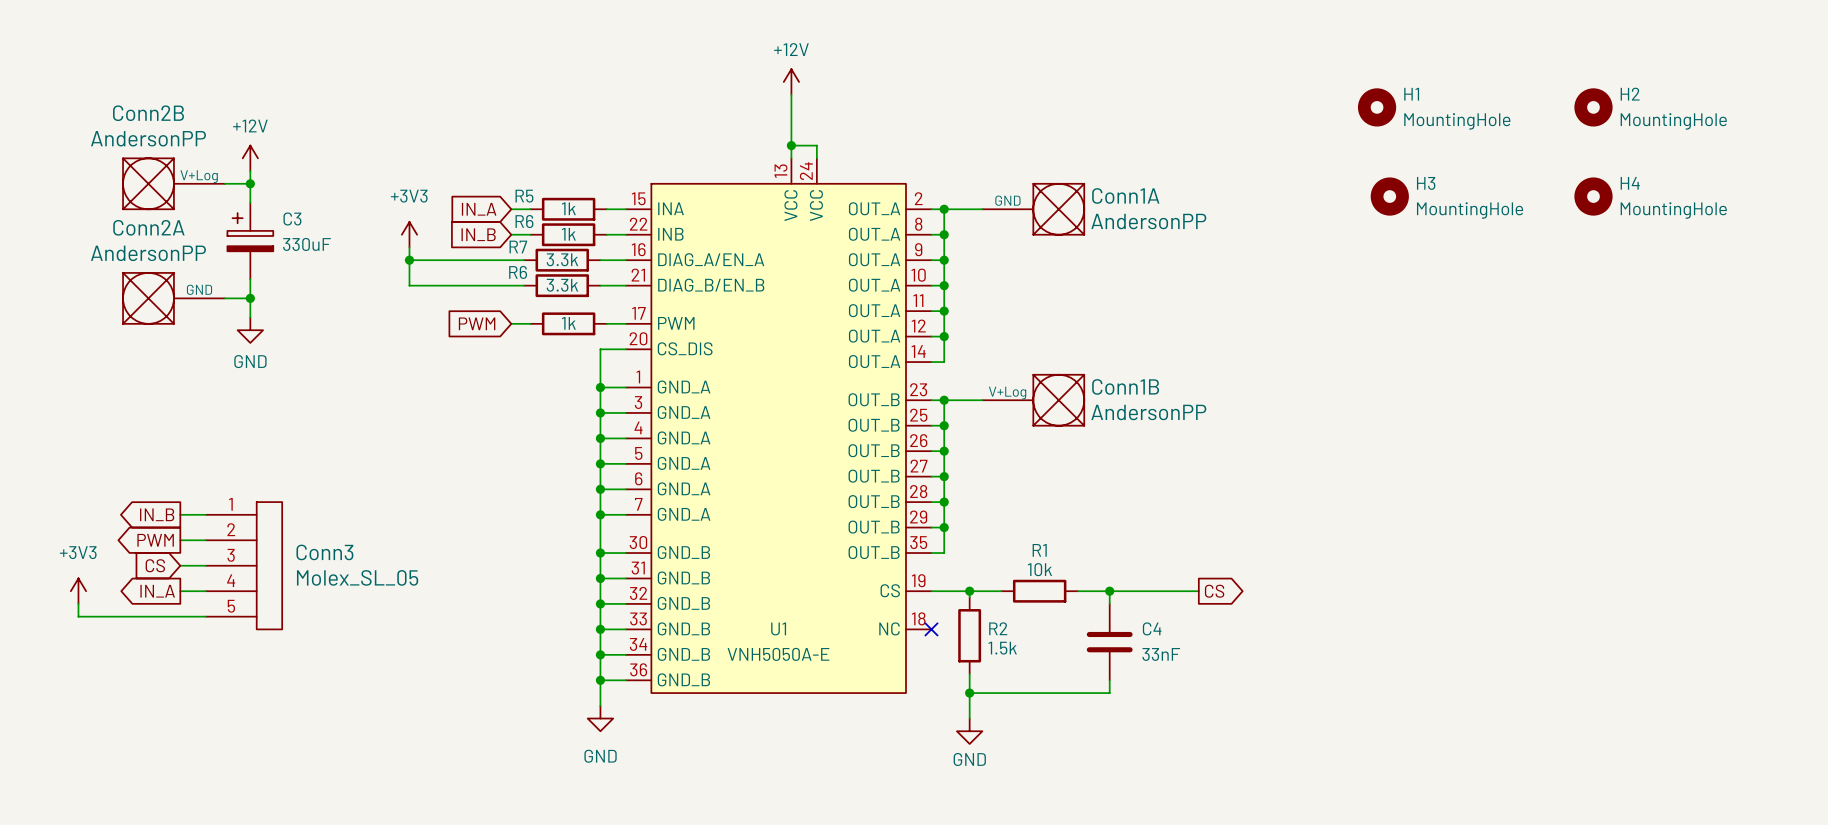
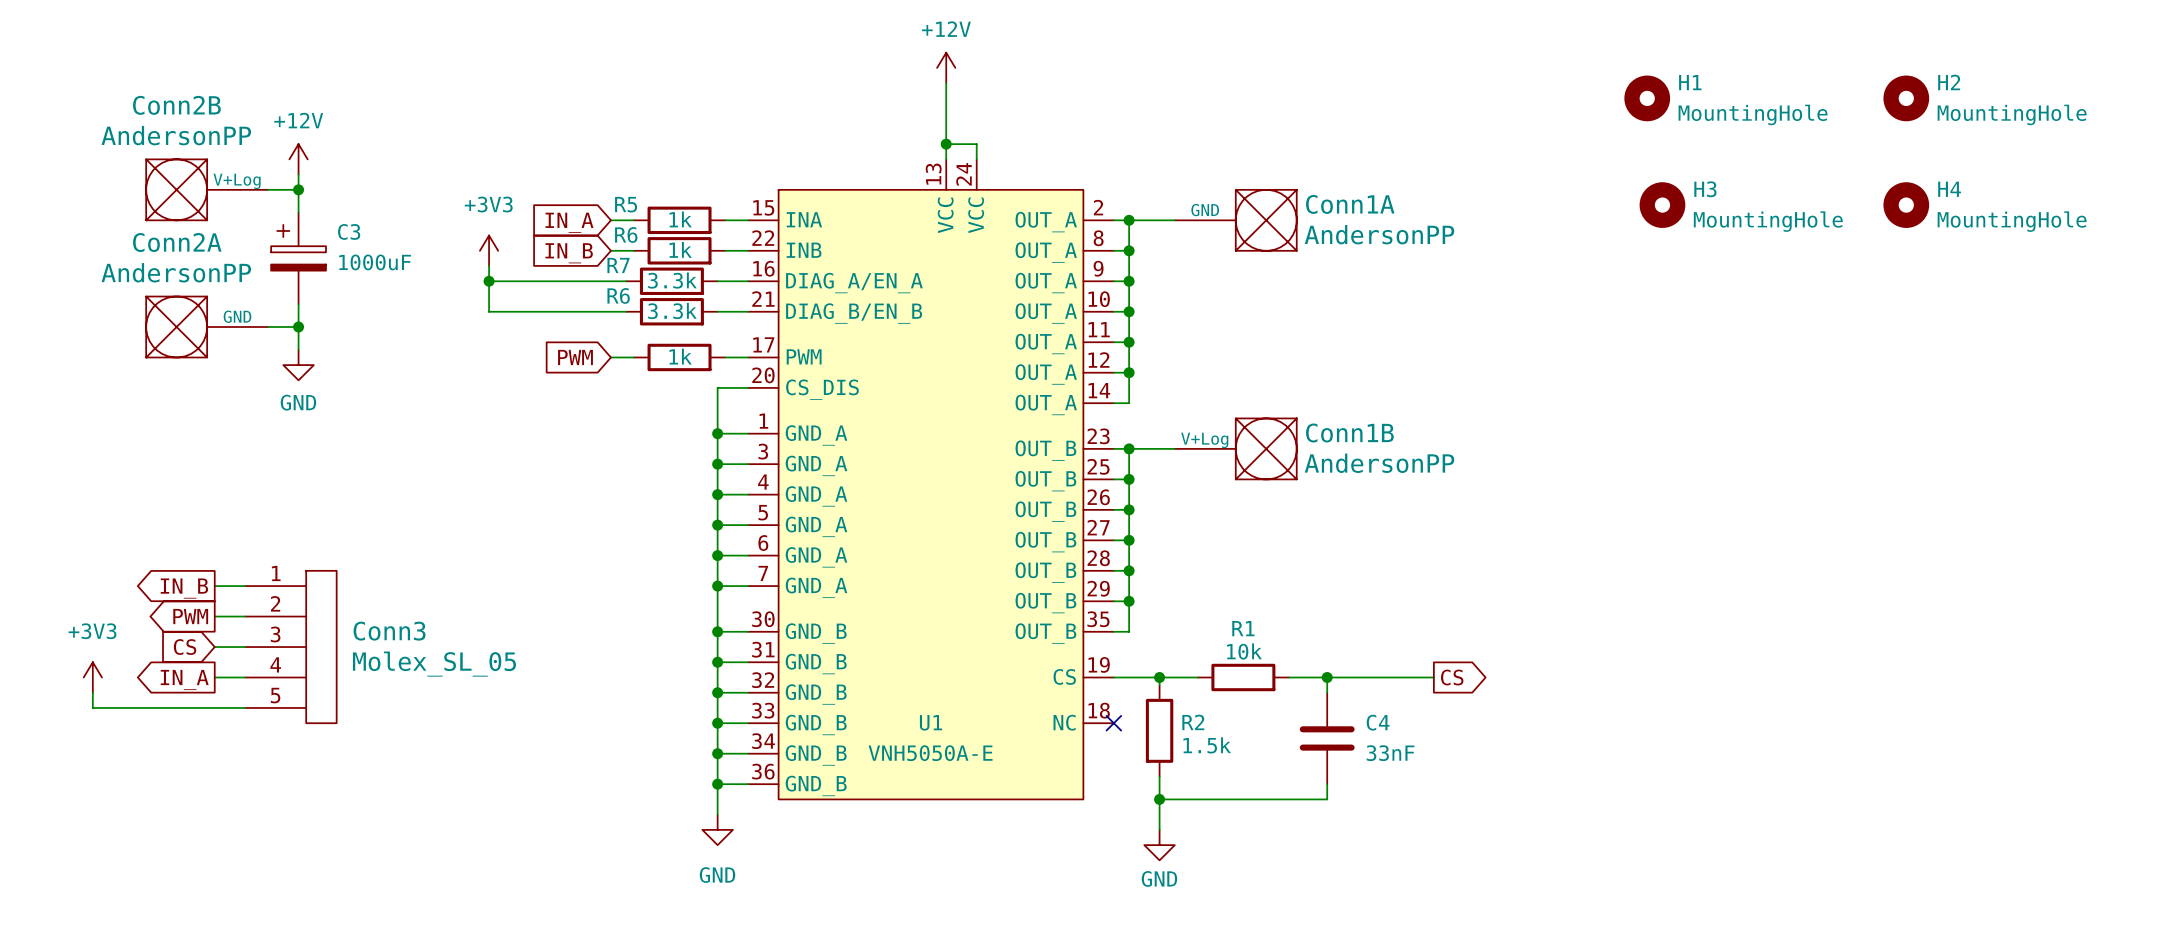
C3 value: 330uF (306, 244) -> 1000uF (375, 262)

